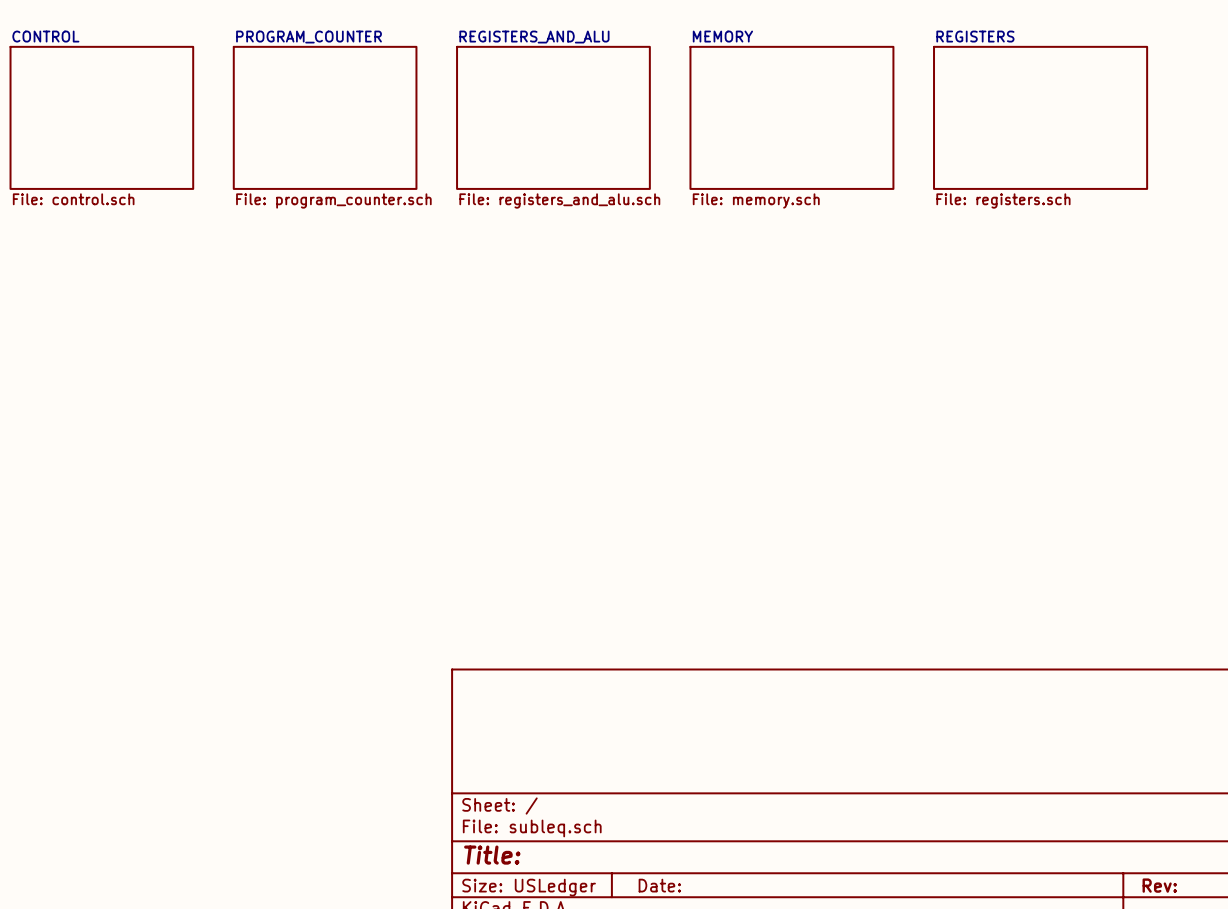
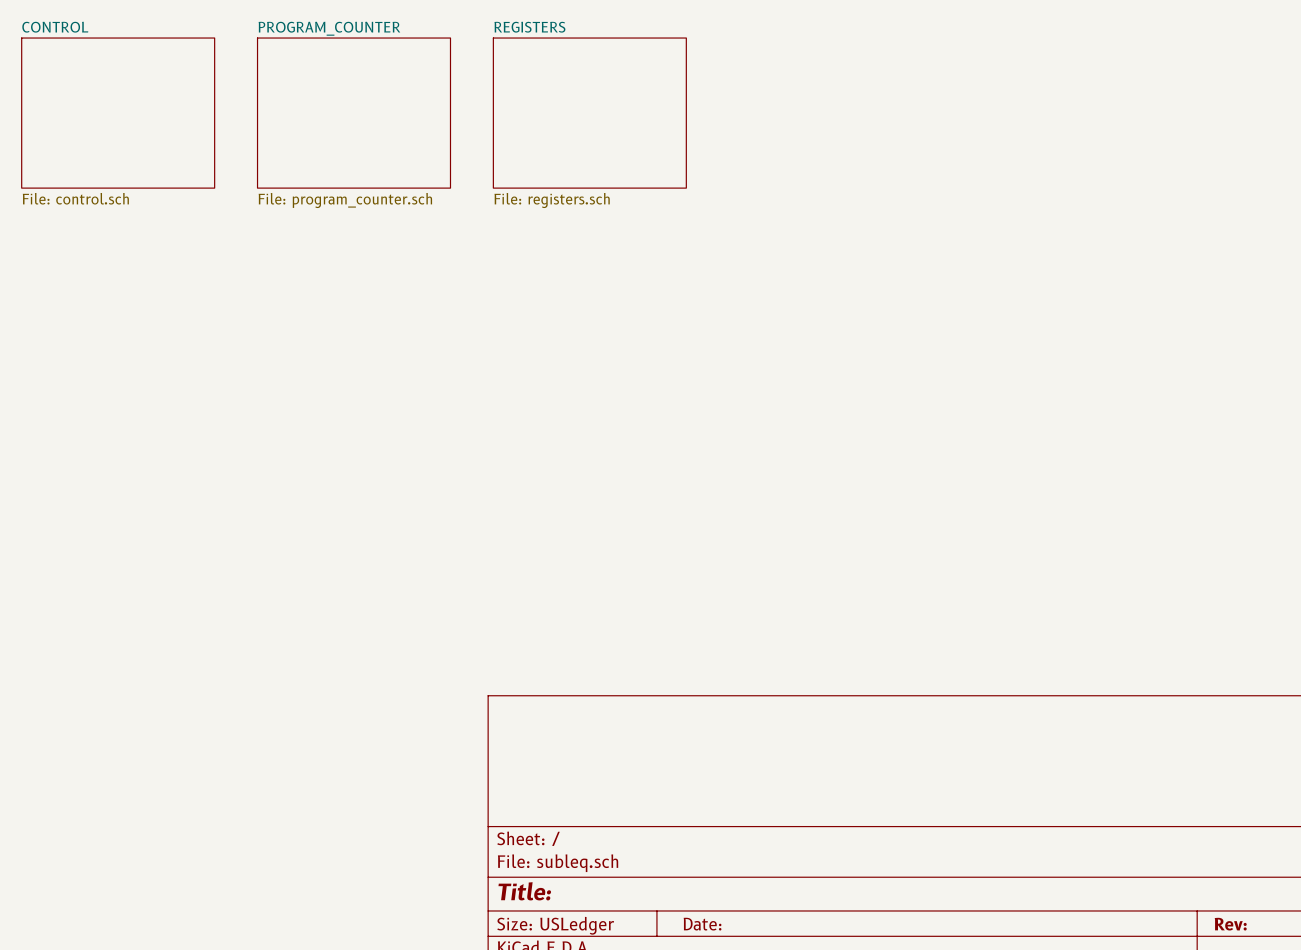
sheet REGISTERS: none -> File: registers.sch (589, 113)
sheet REGISTERS_AND_ALU: File: registers_and_alu.sch (553, 117) -> none
sheet MEMORY: File: memory.sch (791, 117) -> none
sheet REGISTERS: File: registers.sch (1040, 117) -> none

